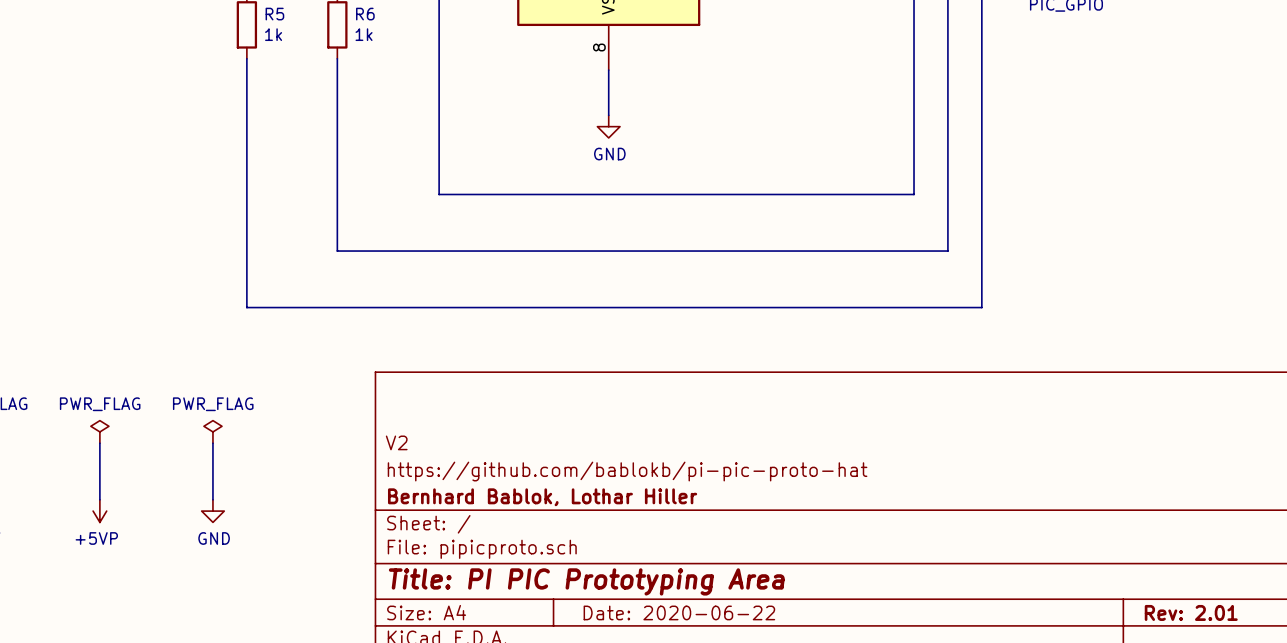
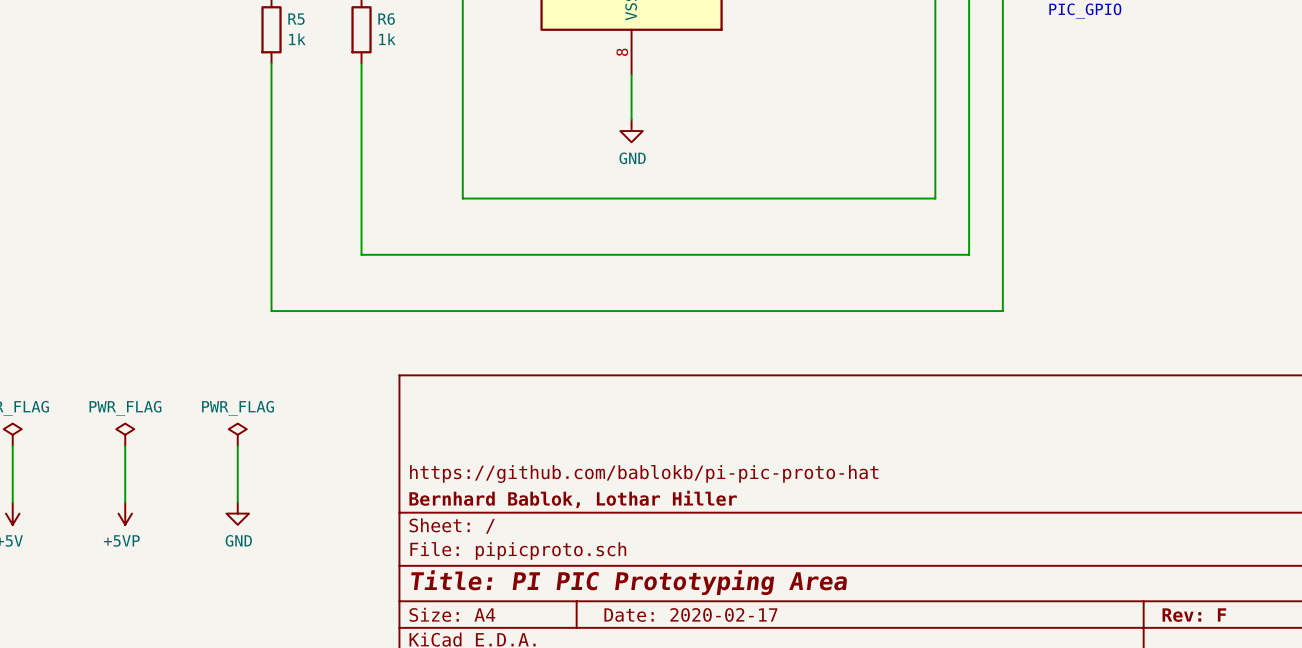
title block: V2 (396, 442) -> none
title block: Date: 2020-06-22 (679, 612) -> Date: 2020-02-17 (690, 614)
title block: Rev: 2.01 (1191, 612) -> Rev: F (1194, 615)

